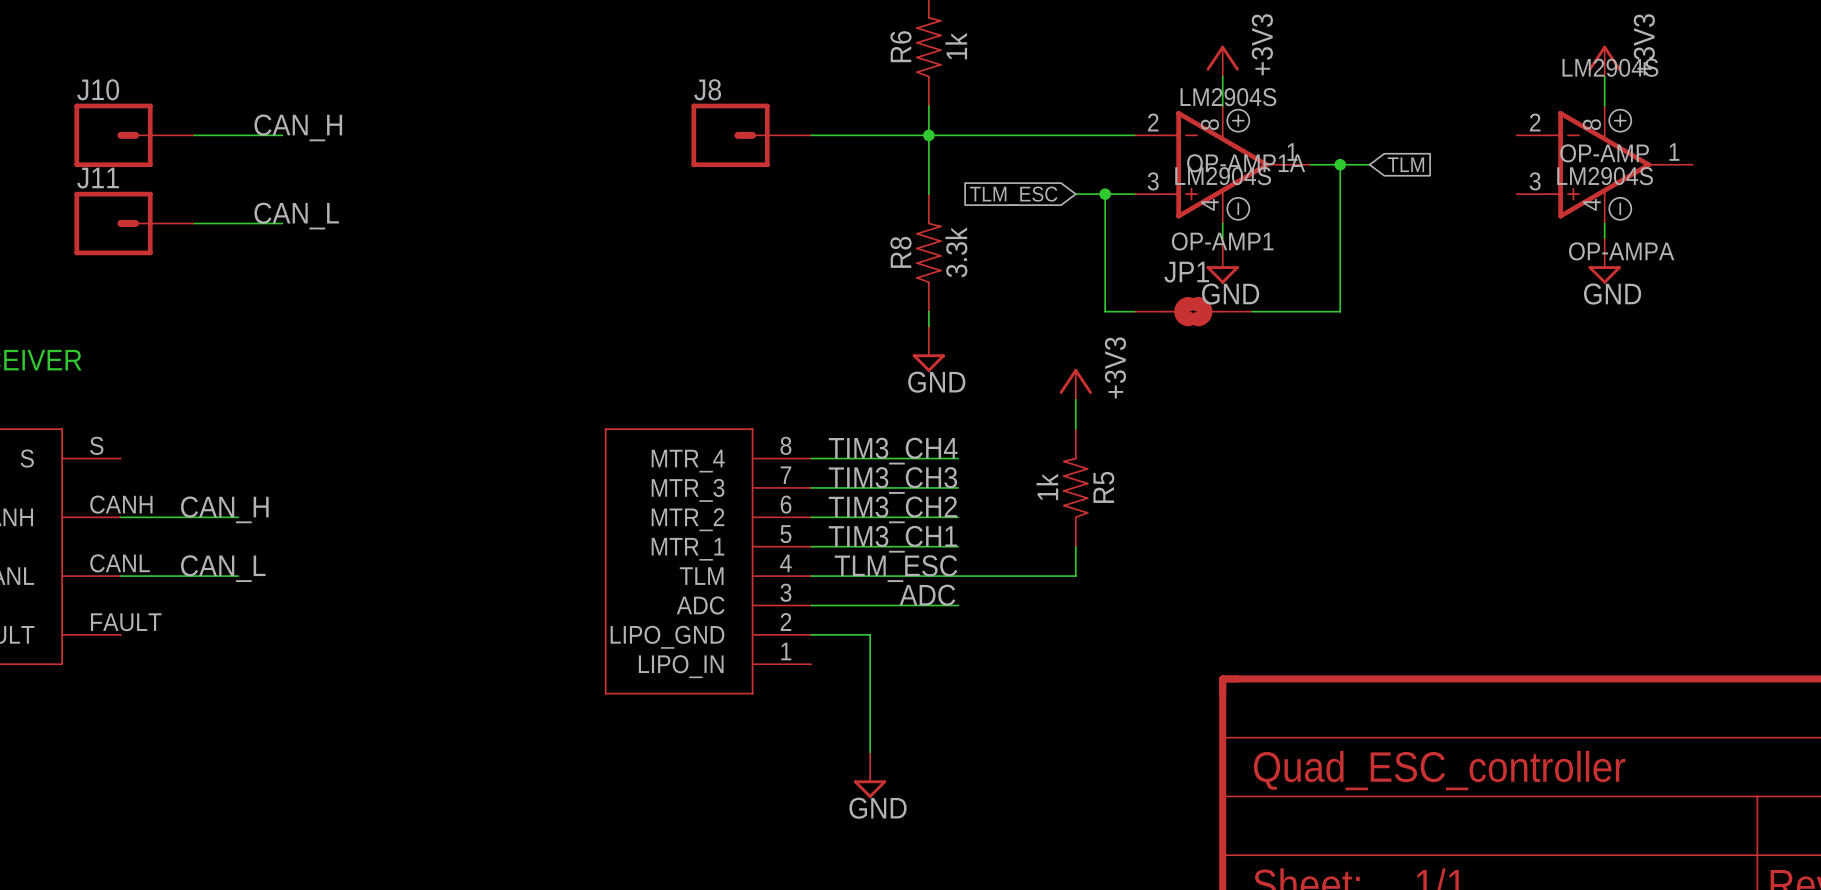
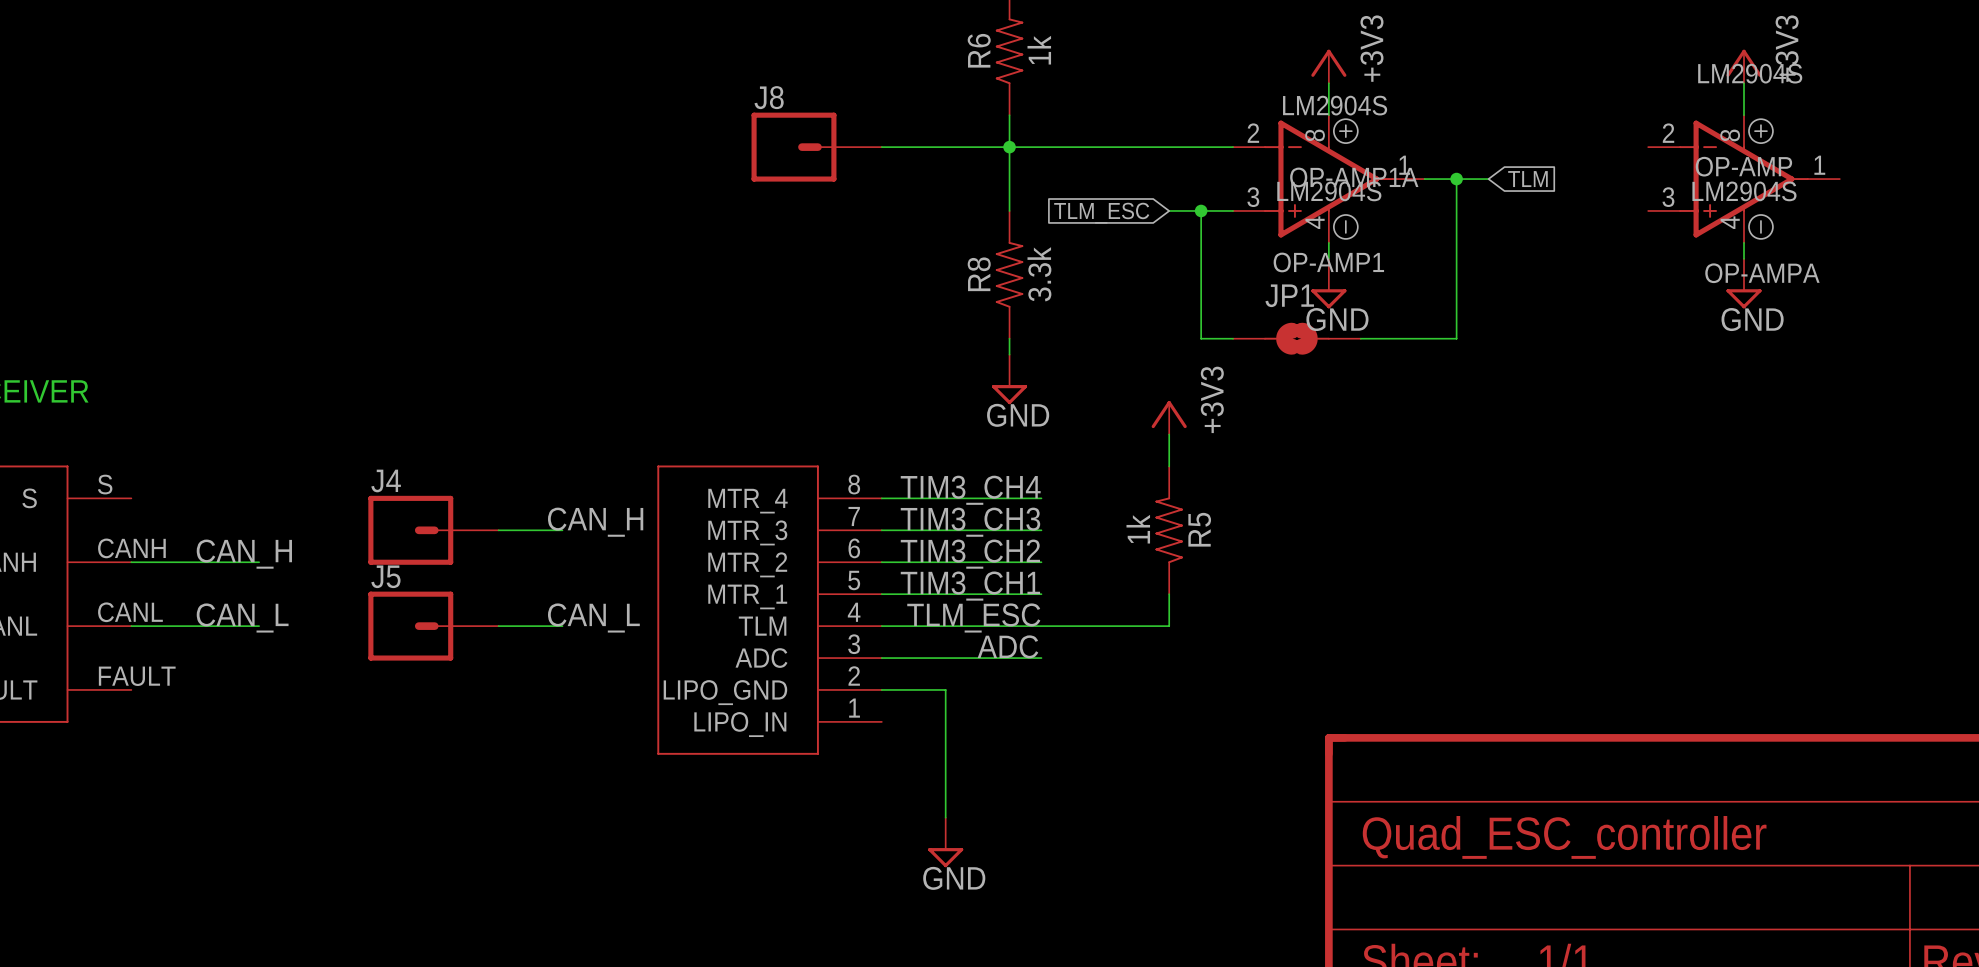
label: CAN_H (298, 127) -> none
J10: (134, 135) -> none
wire: (194, 135) (282, 135) -> none
label: CAN_L (296, 216) -> none
J11: (134, 223) -> none
wire: (194, 223) (282, 223) -> none
label: none -> CAN_H (595, 522)
J4: none -> (433, 530)
wire: none -> (498, 530) (562, 530)
label: none -> CAN_L (593, 617)
J5: none -> (433, 626)
wire: none -> (498, 626) (562, 626)

